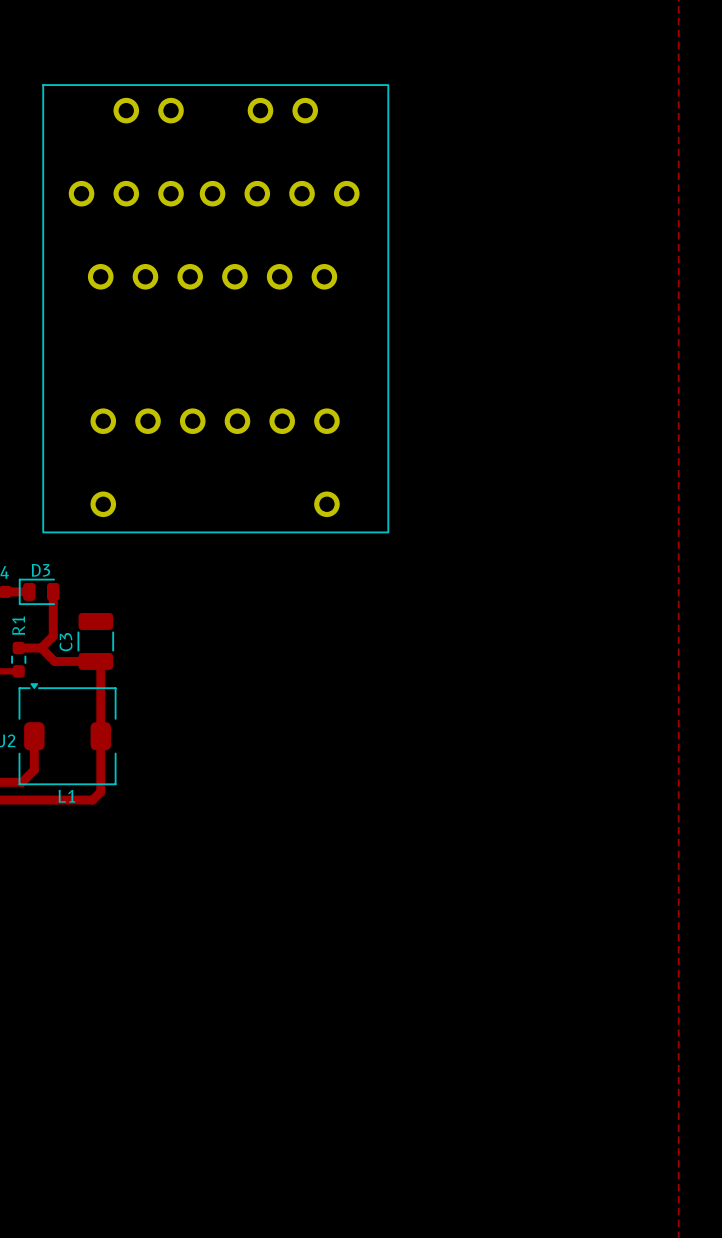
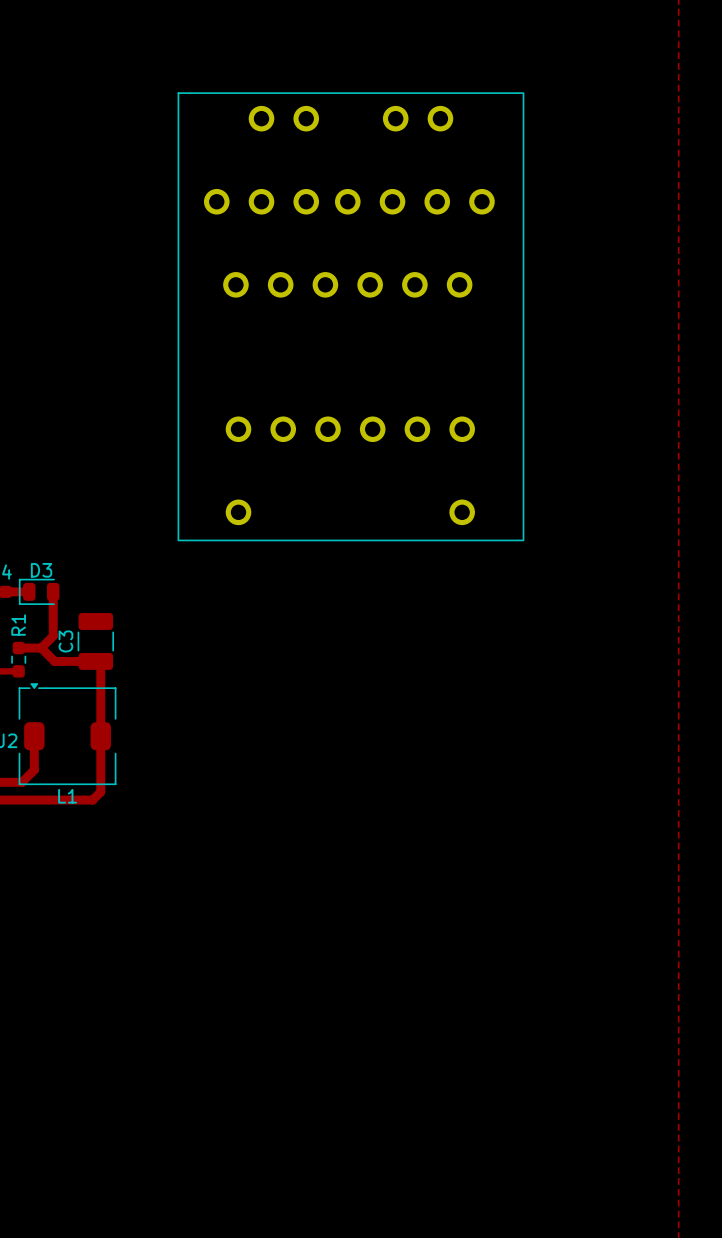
part position: (215, 308) -> (350, 316)

